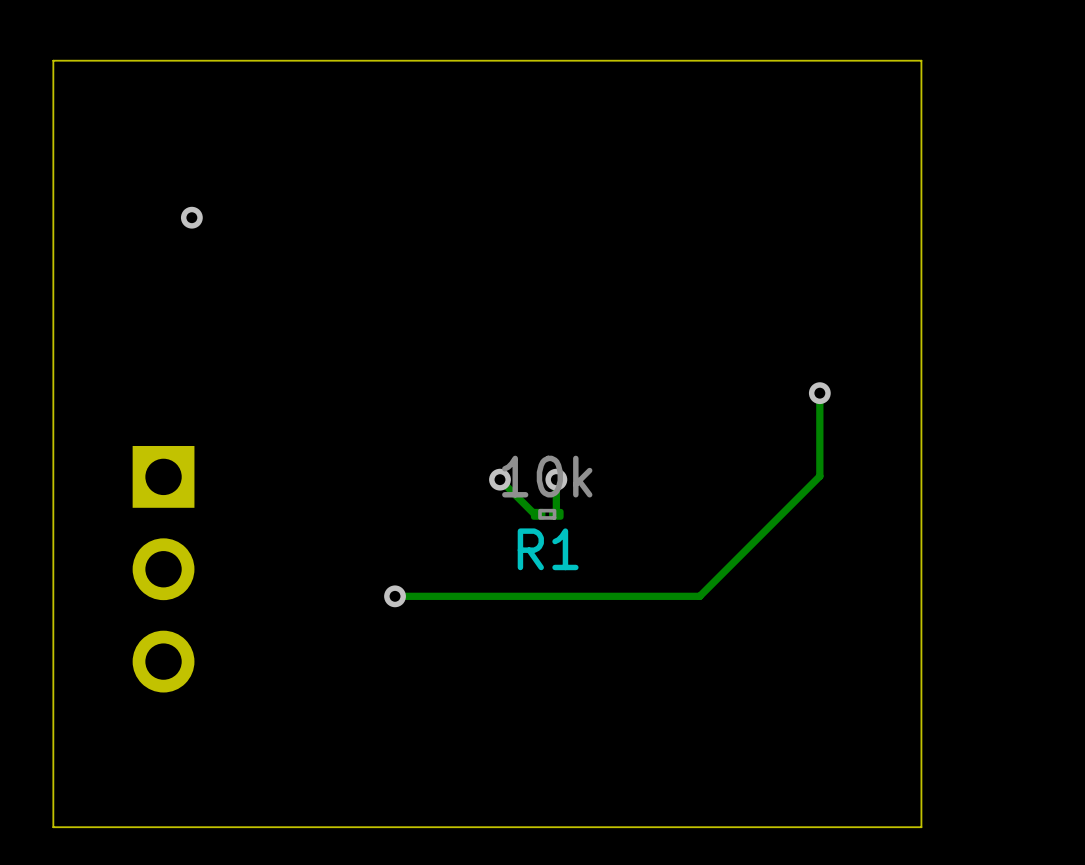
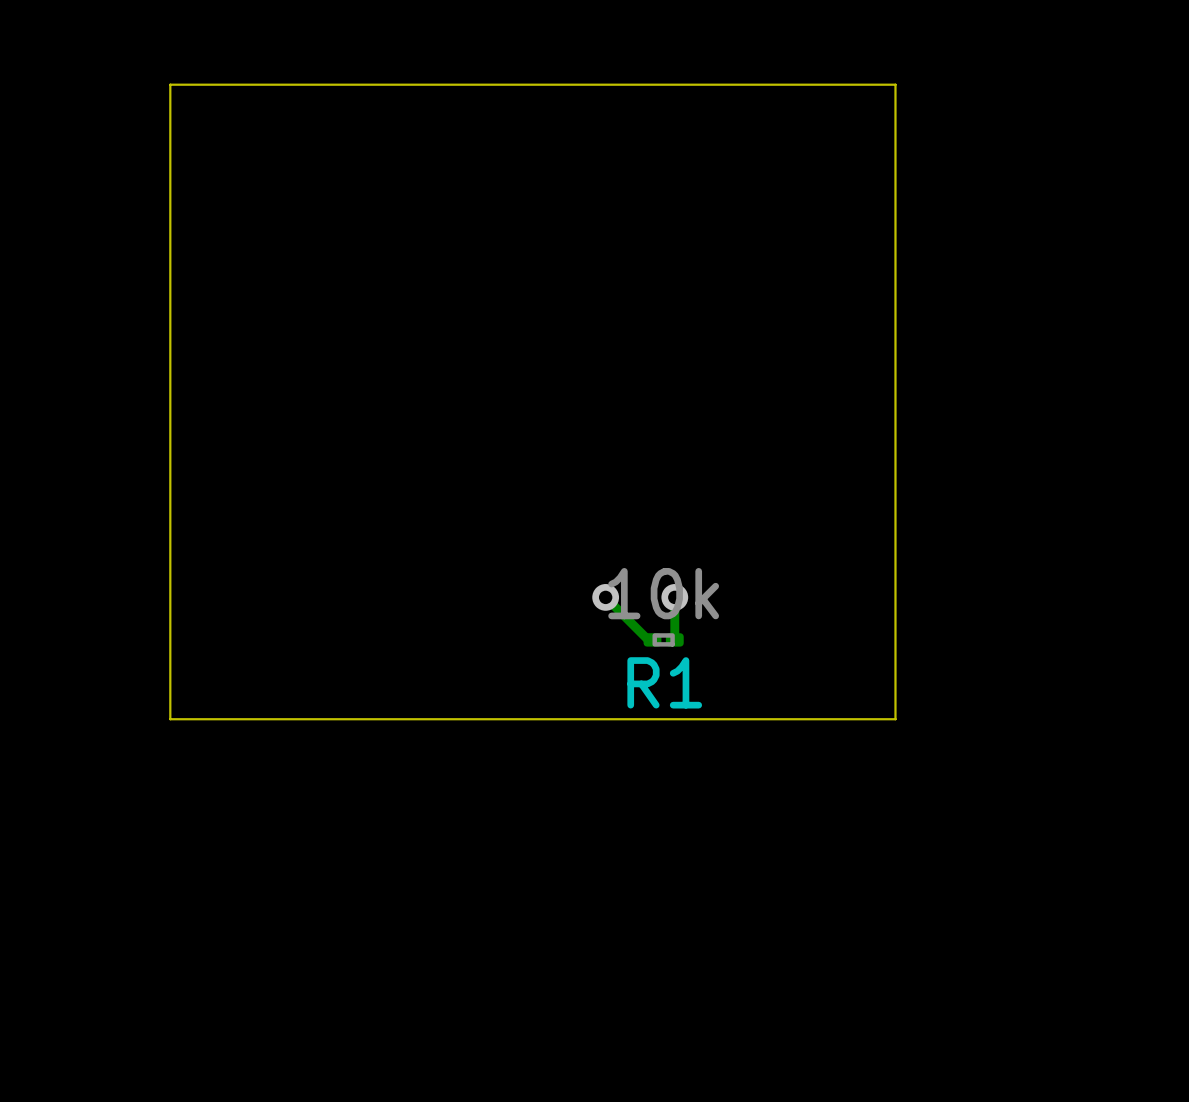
board edge: (921, 60) (53, 60) (53, 827) (921, 827) (921, 60) -> none
board edge: none -> (895, 84) (170, 84) (170, 719) (895, 719) (895, 84)
via: (191, 217) -> none
track: (819, 393) (819, 476) (699, 596) (395, 596) -> none
via: (819, 393) -> none
part: (163, 569) -> none
via: (395, 596) -> none

